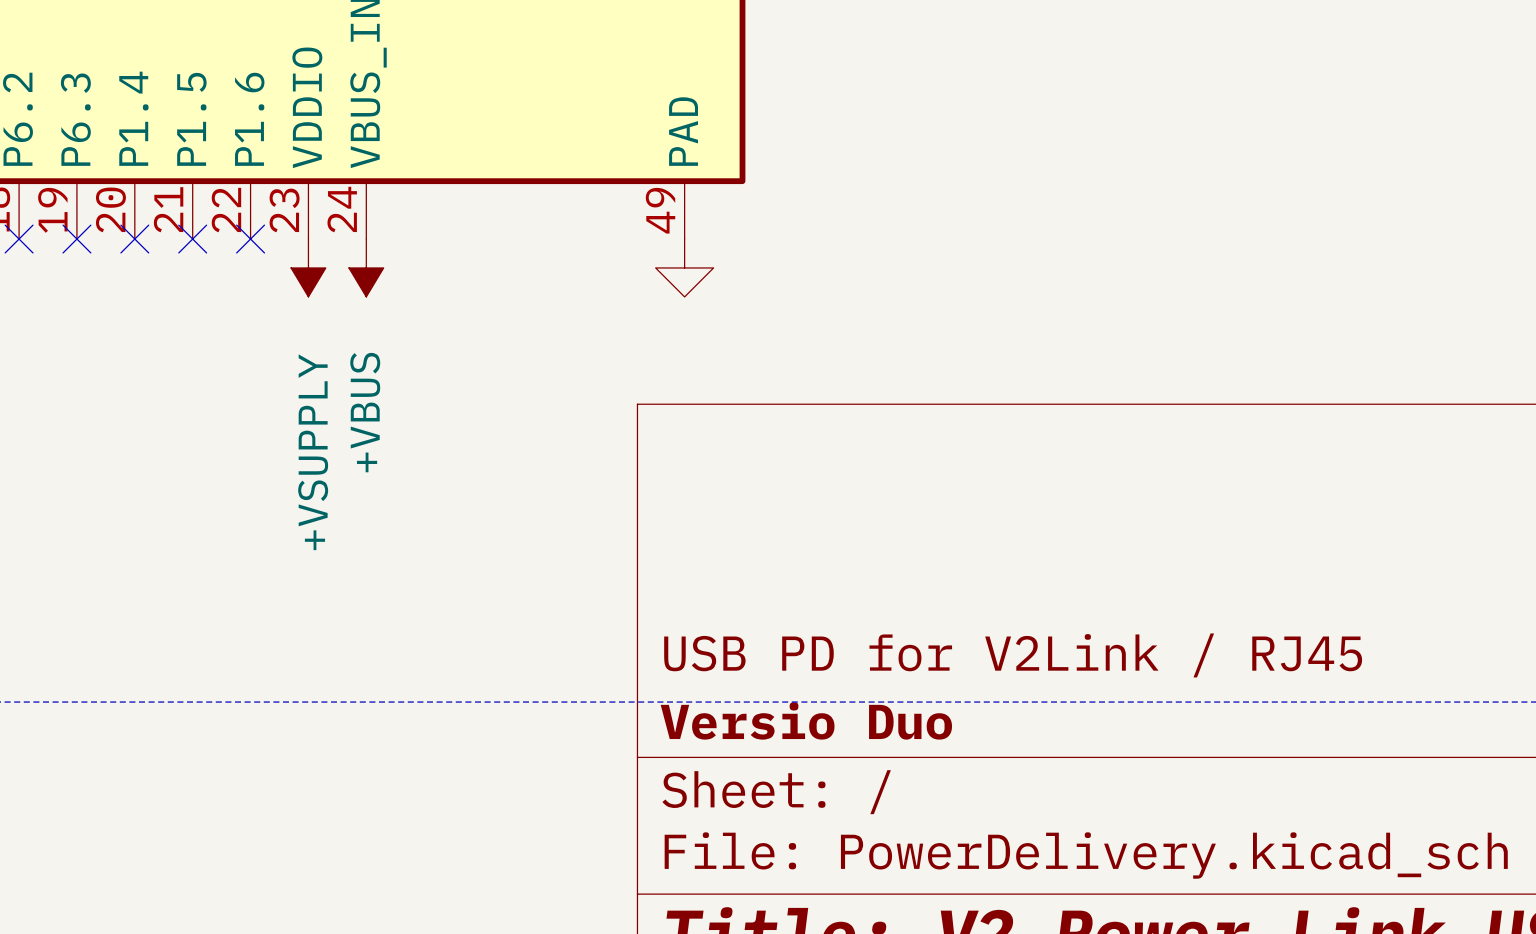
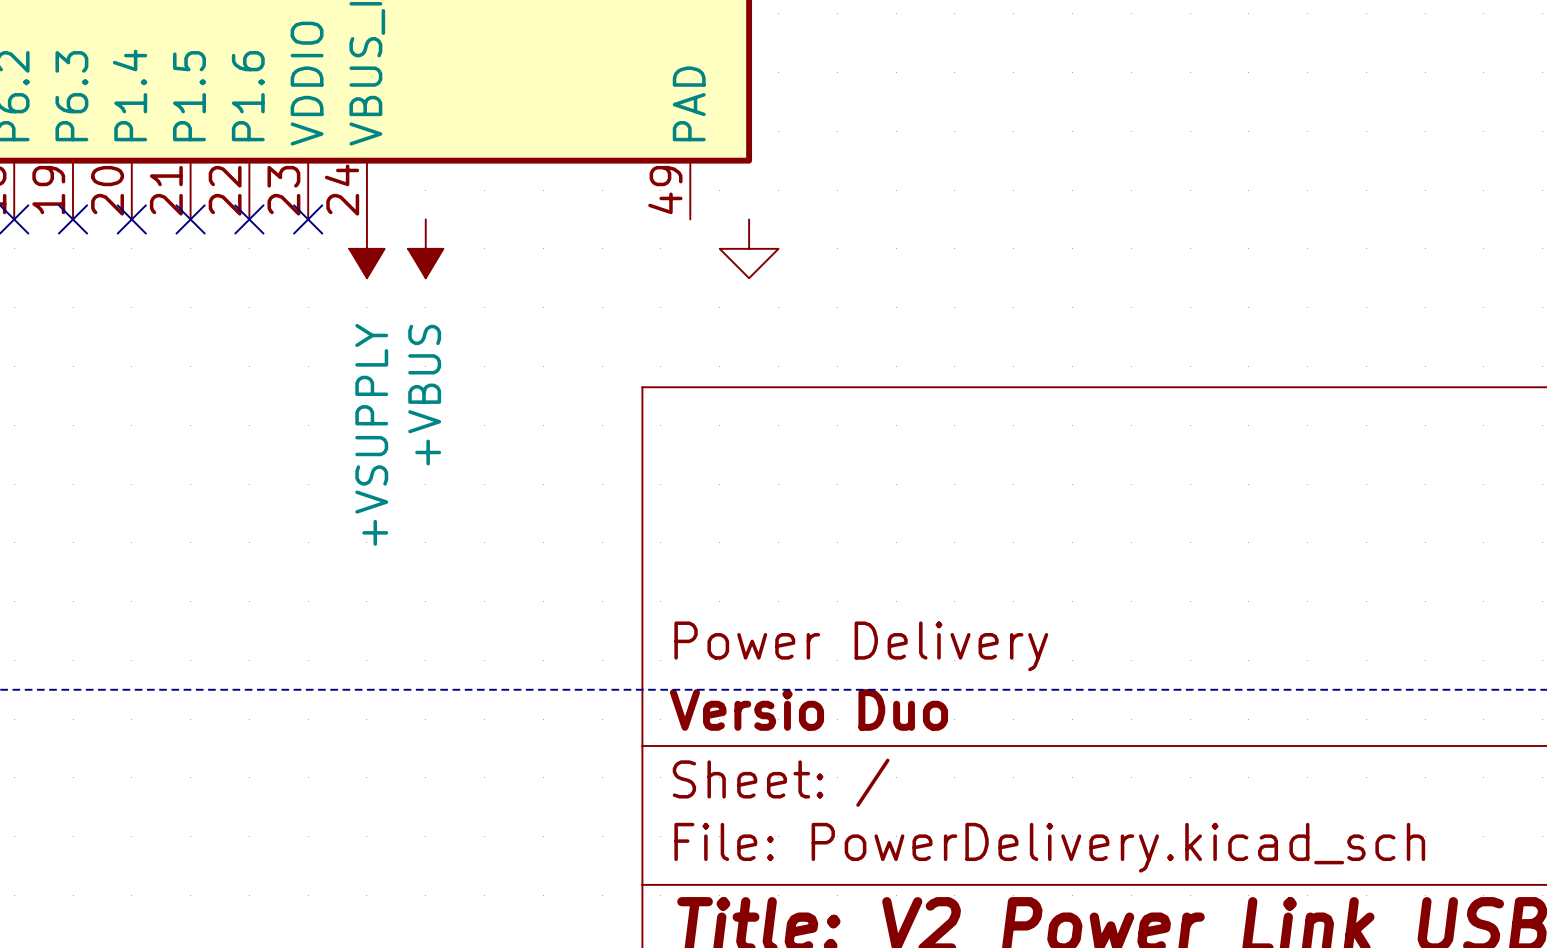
no-connect mark: none -> (308, 219)
power symbol: +VSUPPLY (308, 267) -> none
power symbol: +VBUS (366, 267) -> +VSUPPLY (366, 248)
power symbol: none -> +VBUS (425, 248)
power symbol position: (684, 267) -> (749, 248)
title block: USB PD for V2Link / RJ45 (1013, 655) -> Power Delivery (861, 646)

